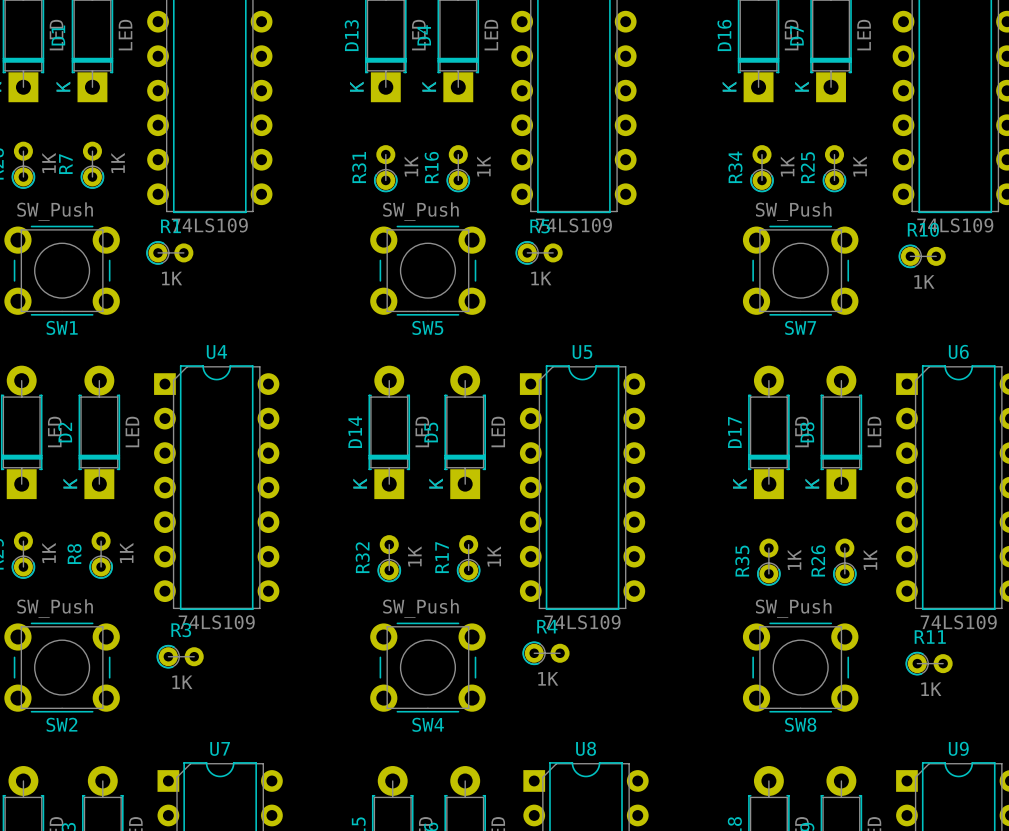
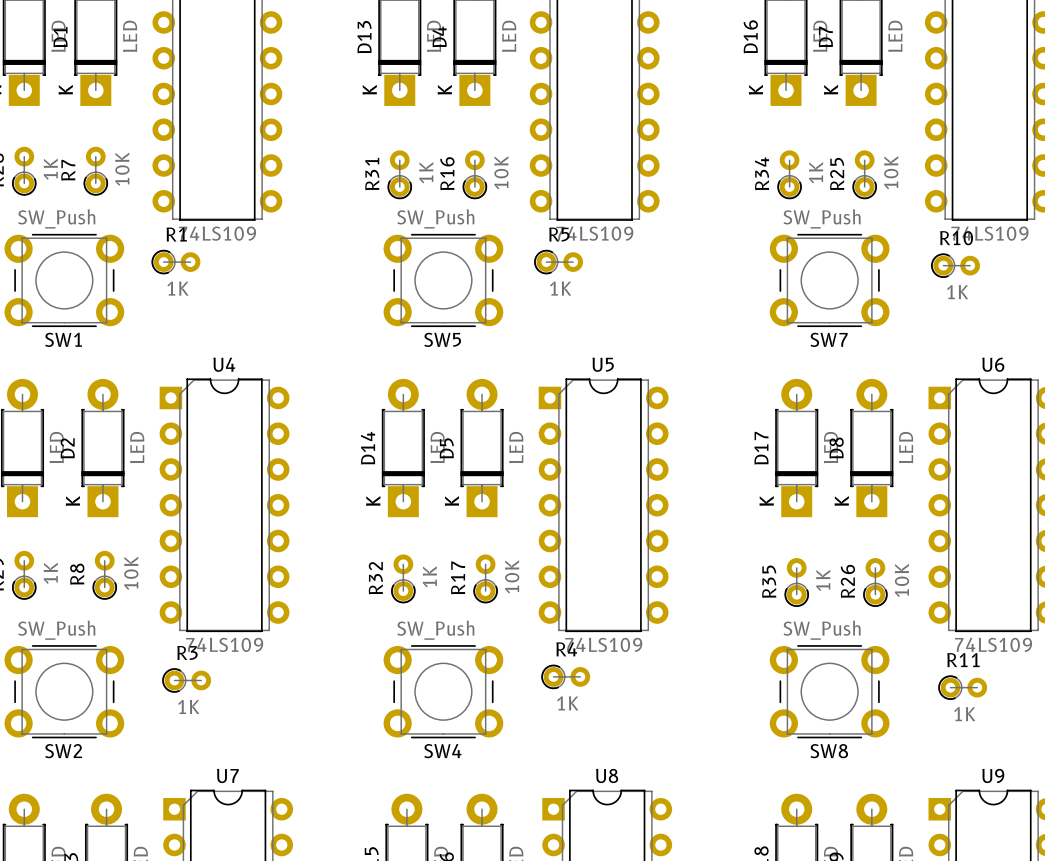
R7 value: 1K (118, 163) -> 10K (122, 169)
R16 value: 1K (483, 166) -> 10K (501, 172)
R25 value: 1K (860, 166) -> 10K (891, 172)
R8 value: 1K (126, 553) -> 10K (131, 573)
R17 value: 1K (494, 556) -> 10K (512, 576)
R26 value: 1K (870, 559) -> 10K (901, 580)

